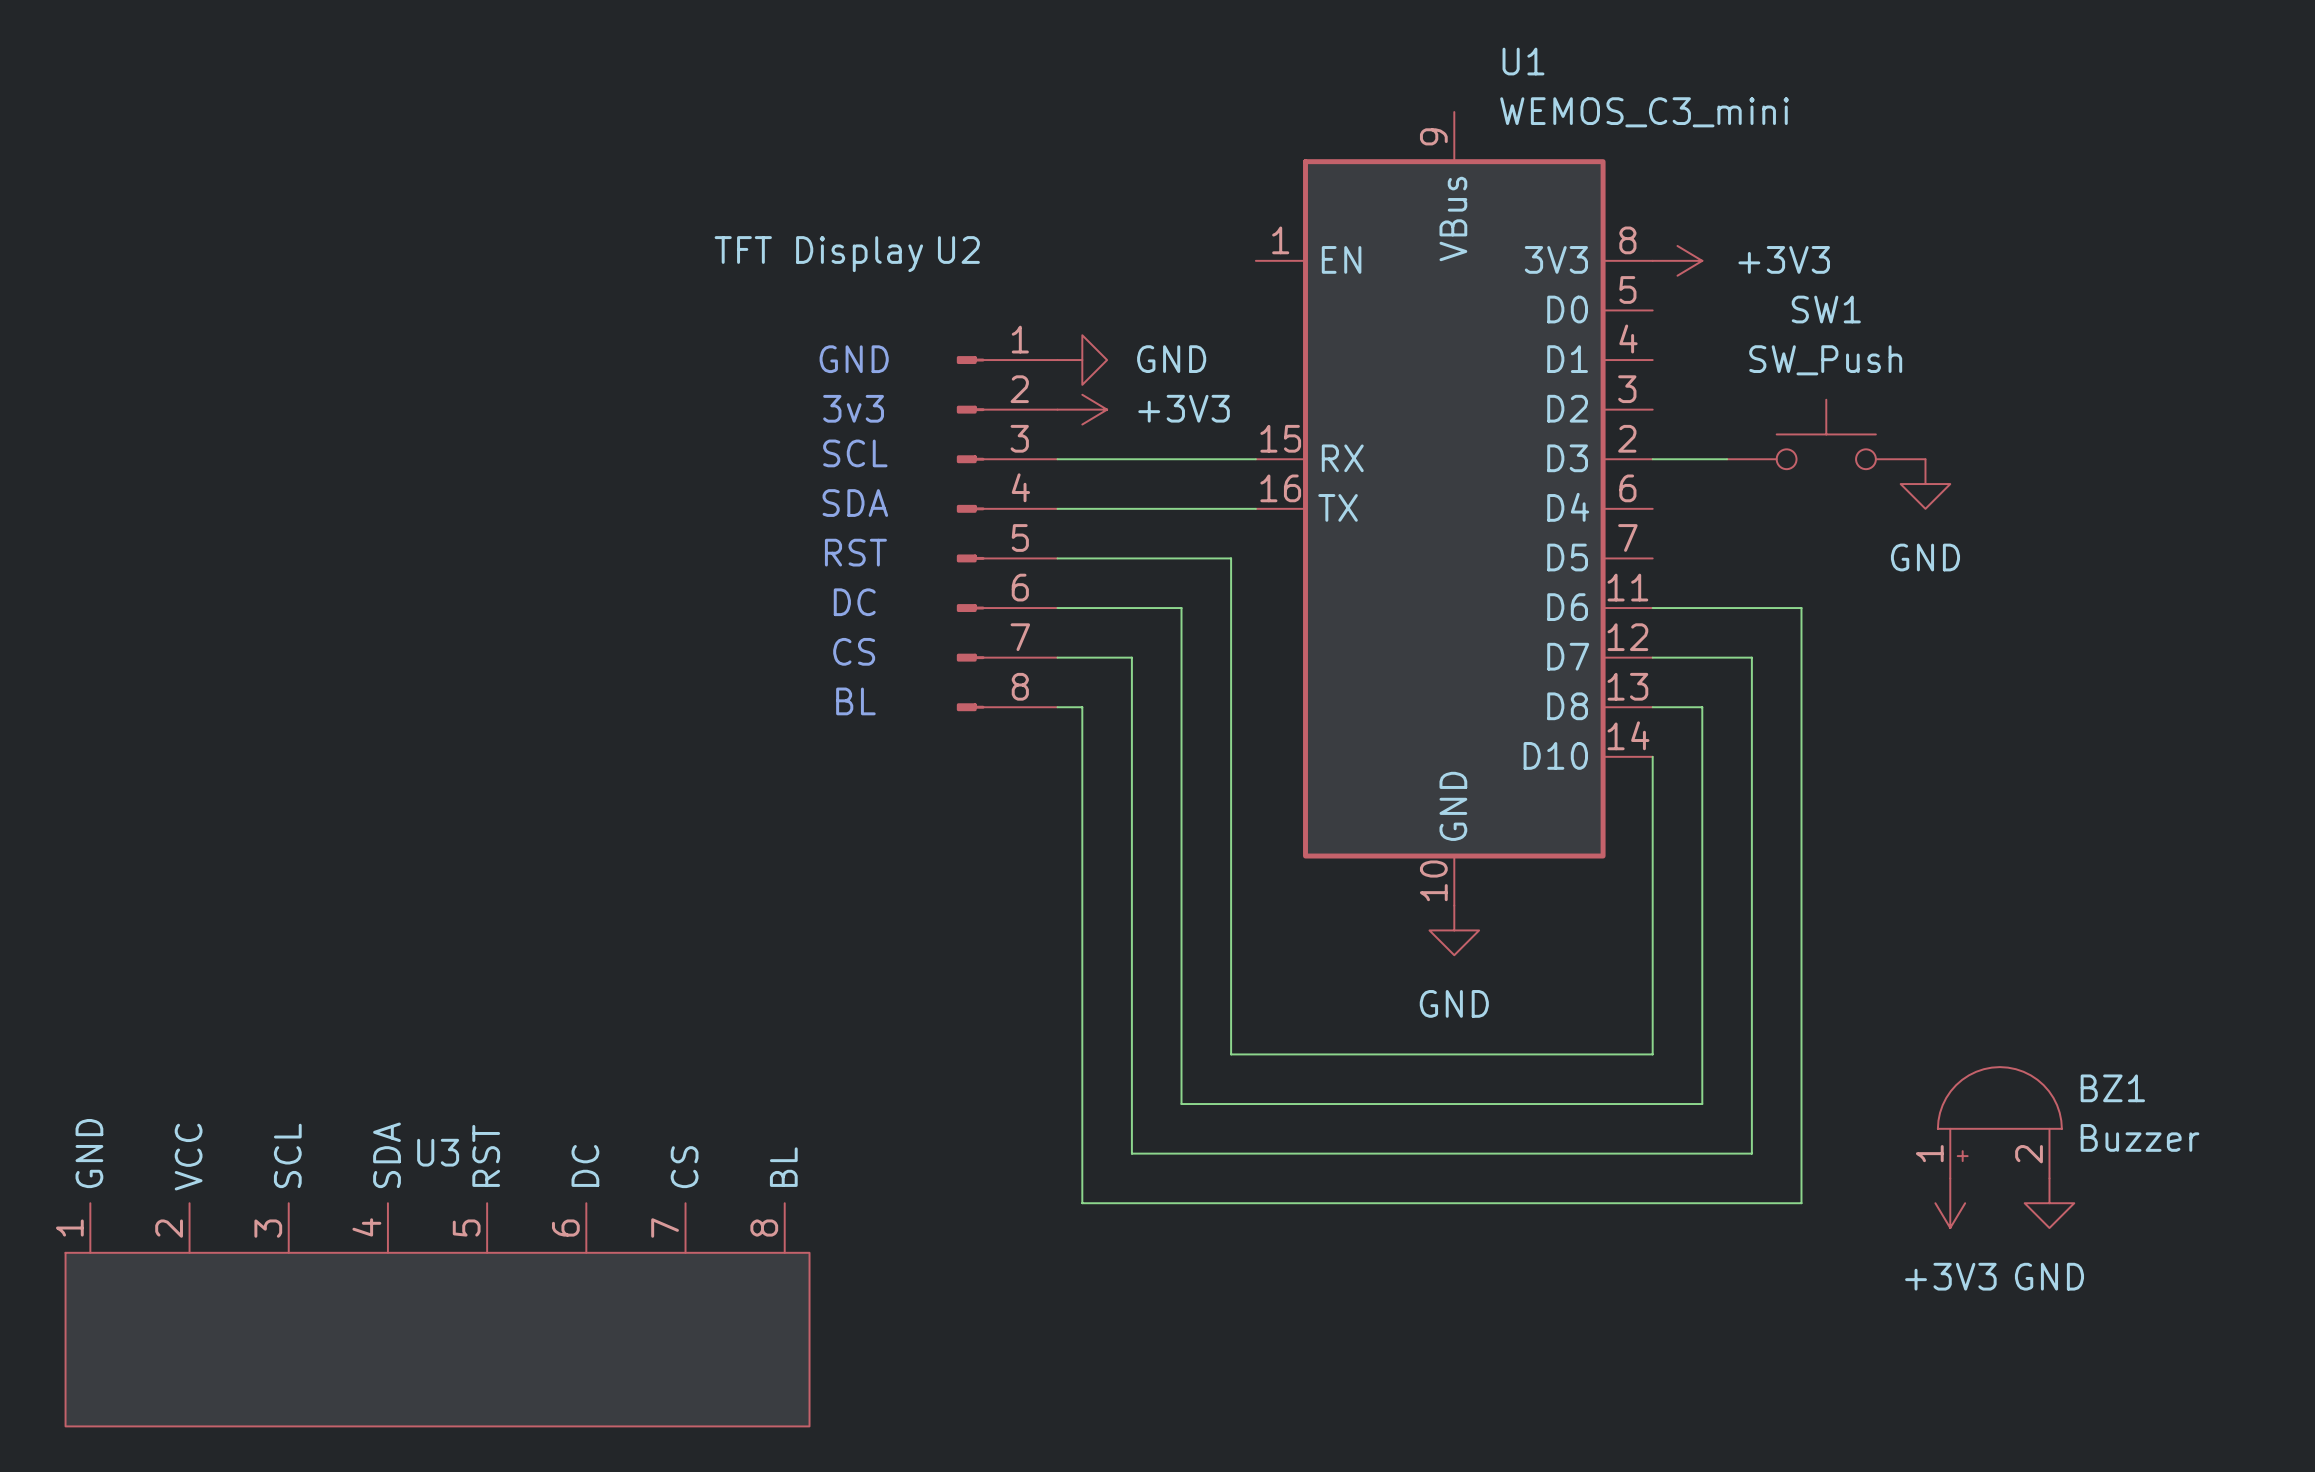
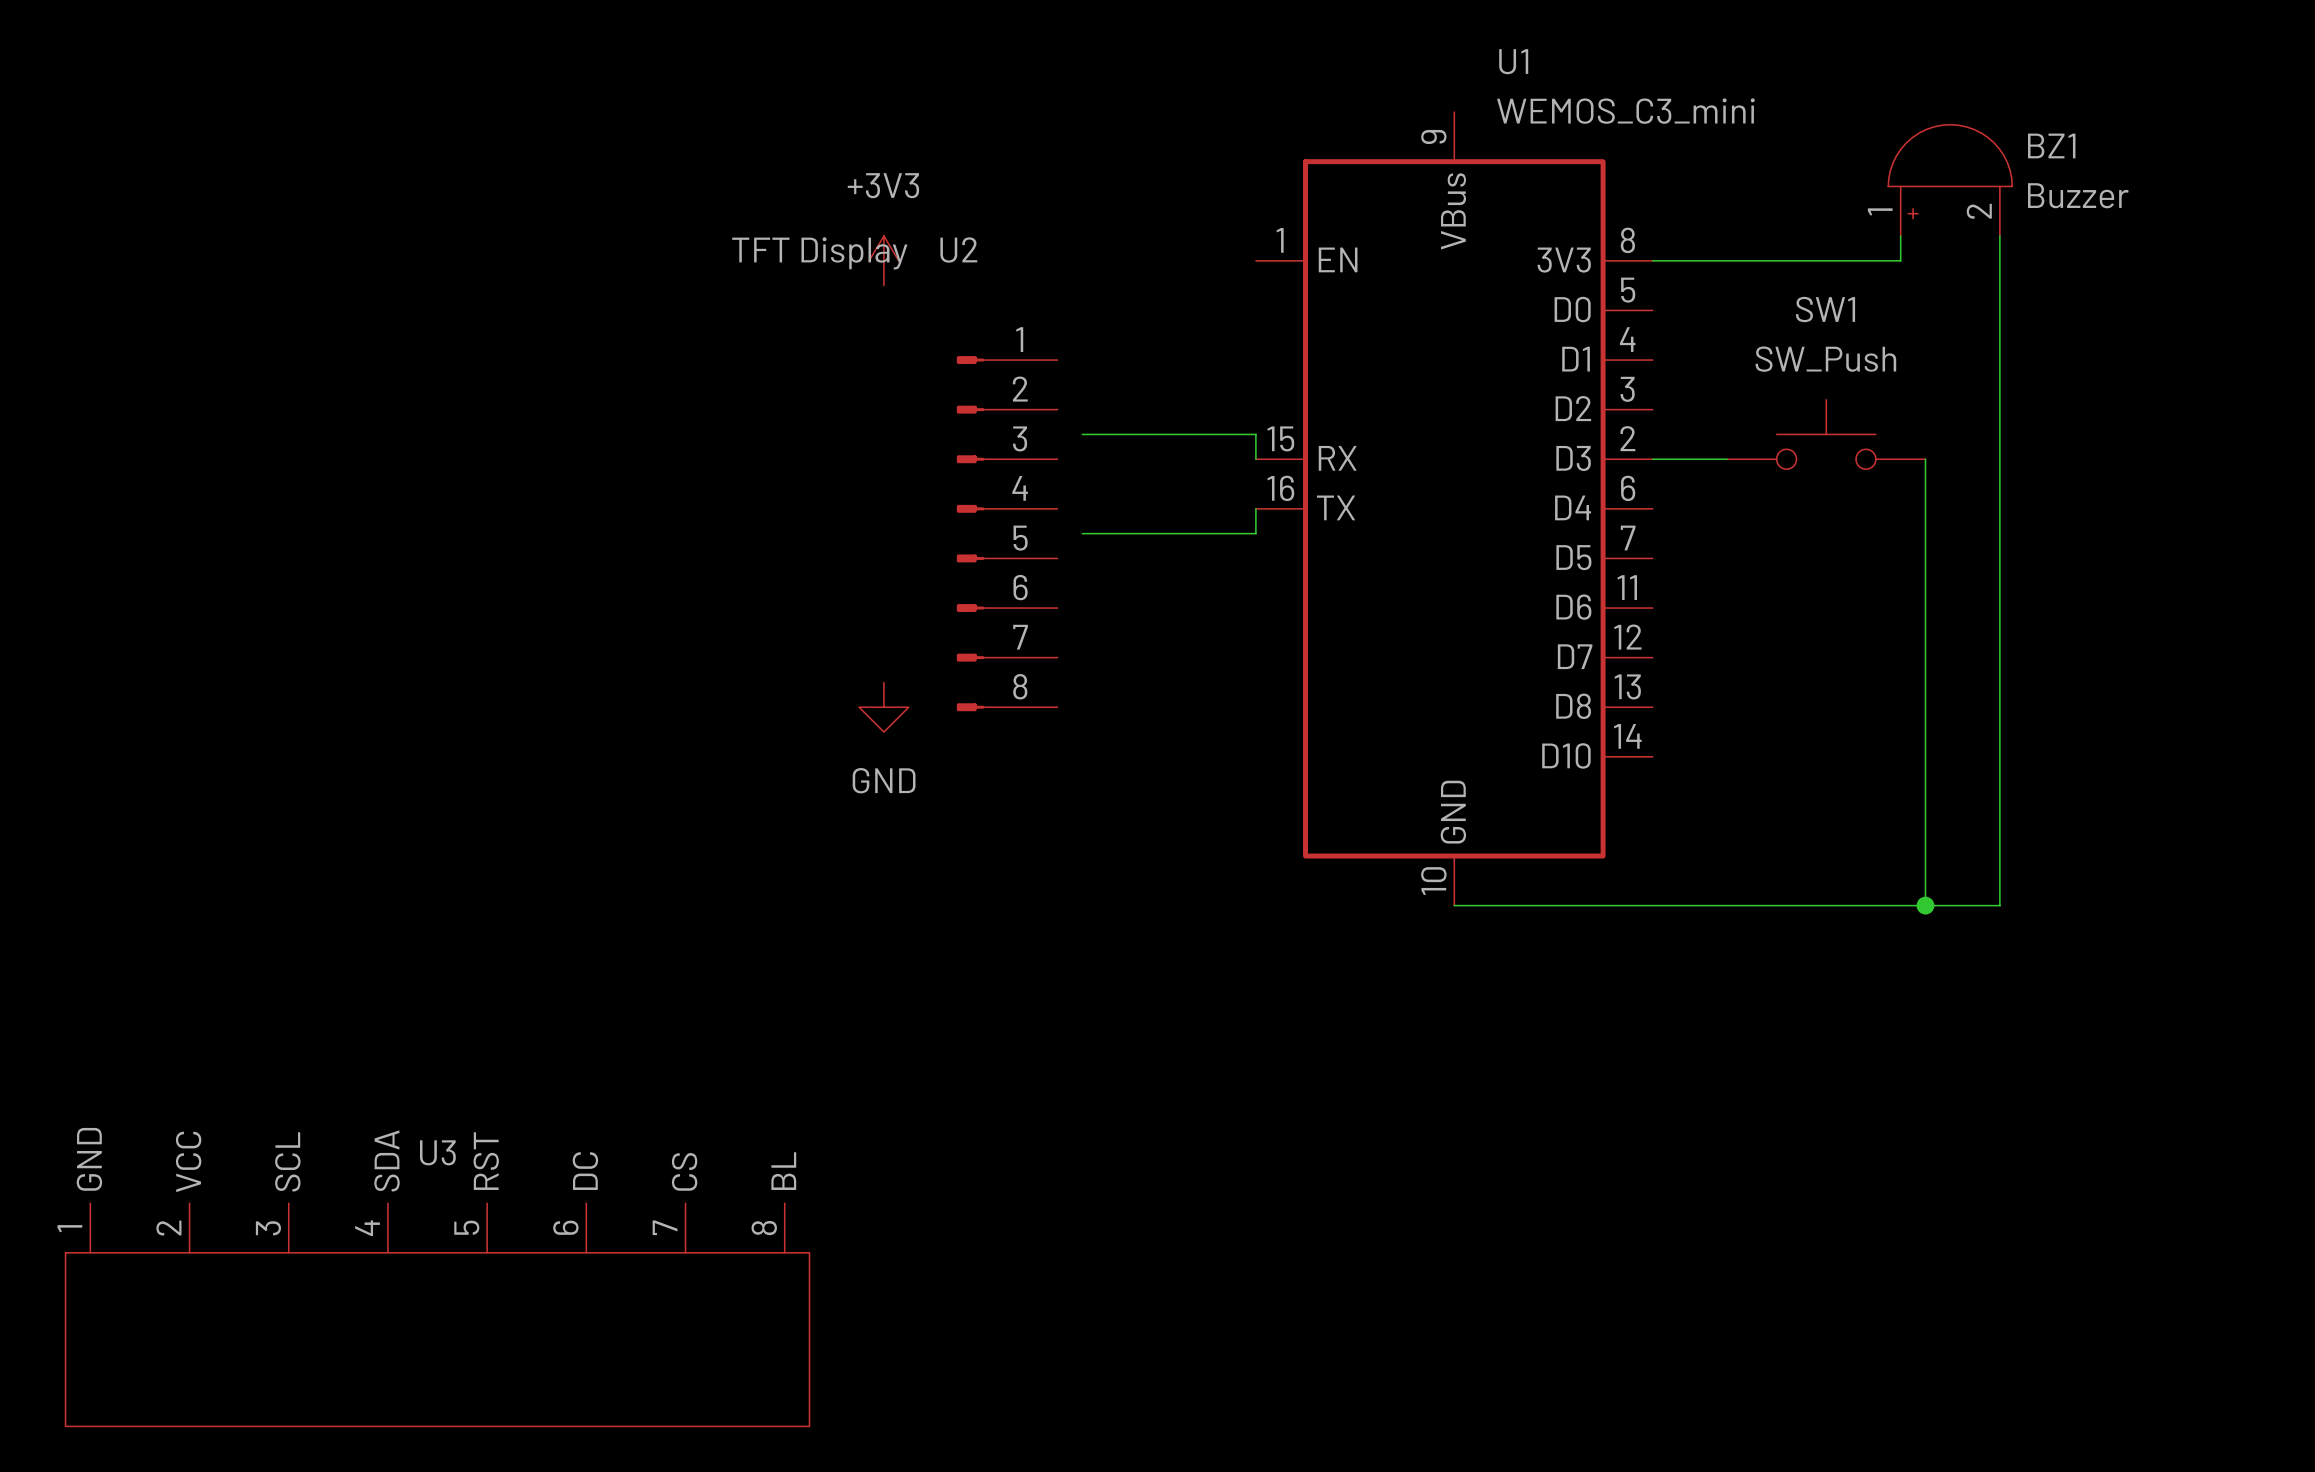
wire: none -> (1900, 236) (1900, 260) (1652, 260)
wire: none -> (1999, 236) (1999, 905) (1454, 905)
power symbol: +3V3 (1677, 260) -> none
text: GND (854, 359) -> none
power symbol: GND (1082, 360) -> none
text: 3v3 (853, 408) -> none
power symbol rotation: 0° (1082, 409) -> 90° counterclockwise (883, 260)
power symbol position: +3V3 (1082, 409) -> +3V3 (883, 260)
text: SCL (855, 453) -> none
wire: (1057, 459) (1255, 459) -> (1082, 434) (1255, 434) (1255, 459)
wire: none -> (1925, 459) (1925, 905)
power symbol: GND (1925, 484) -> none
text: SDA (855, 503) -> none
wire: (1057, 508) (1255, 508) -> (1082, 533) (1255, 533) (1255, 508)
text: RST (855, 552) -> none
wire: (1057, 558) (1231, 558) (1231, 1054) (1652, 1054) (1652, 756) -> none
text: DC (854, 602) -> none
wire: (1057, 608) (1181, 608) (1181, 1104) (1702, 1104) (1702, 707) (1652, 707) -> none
wire: (1652, 608) (1801, 608) (1801, 1203) (1082, 1203) (1082, 707) (1057, 707) -> none
text: CS (854, 651) -> none
wire: (1057, 657) (1131, 657) (1131, 1153) (1751, 1153) (1751, 657) (1652, 657) -> none
text: BL (855, 701) -> none
power symbol: none -> GND (883, 707)
junction: none -> (1925, 905)
power symbol: GND (1454, 930) -> none
BZ1 position: (1999, 1122) -> (1950, 180)
power symbol: +3V3 (1950, 1203) -> none
power symbol: GND (2049, 1203) -> none

